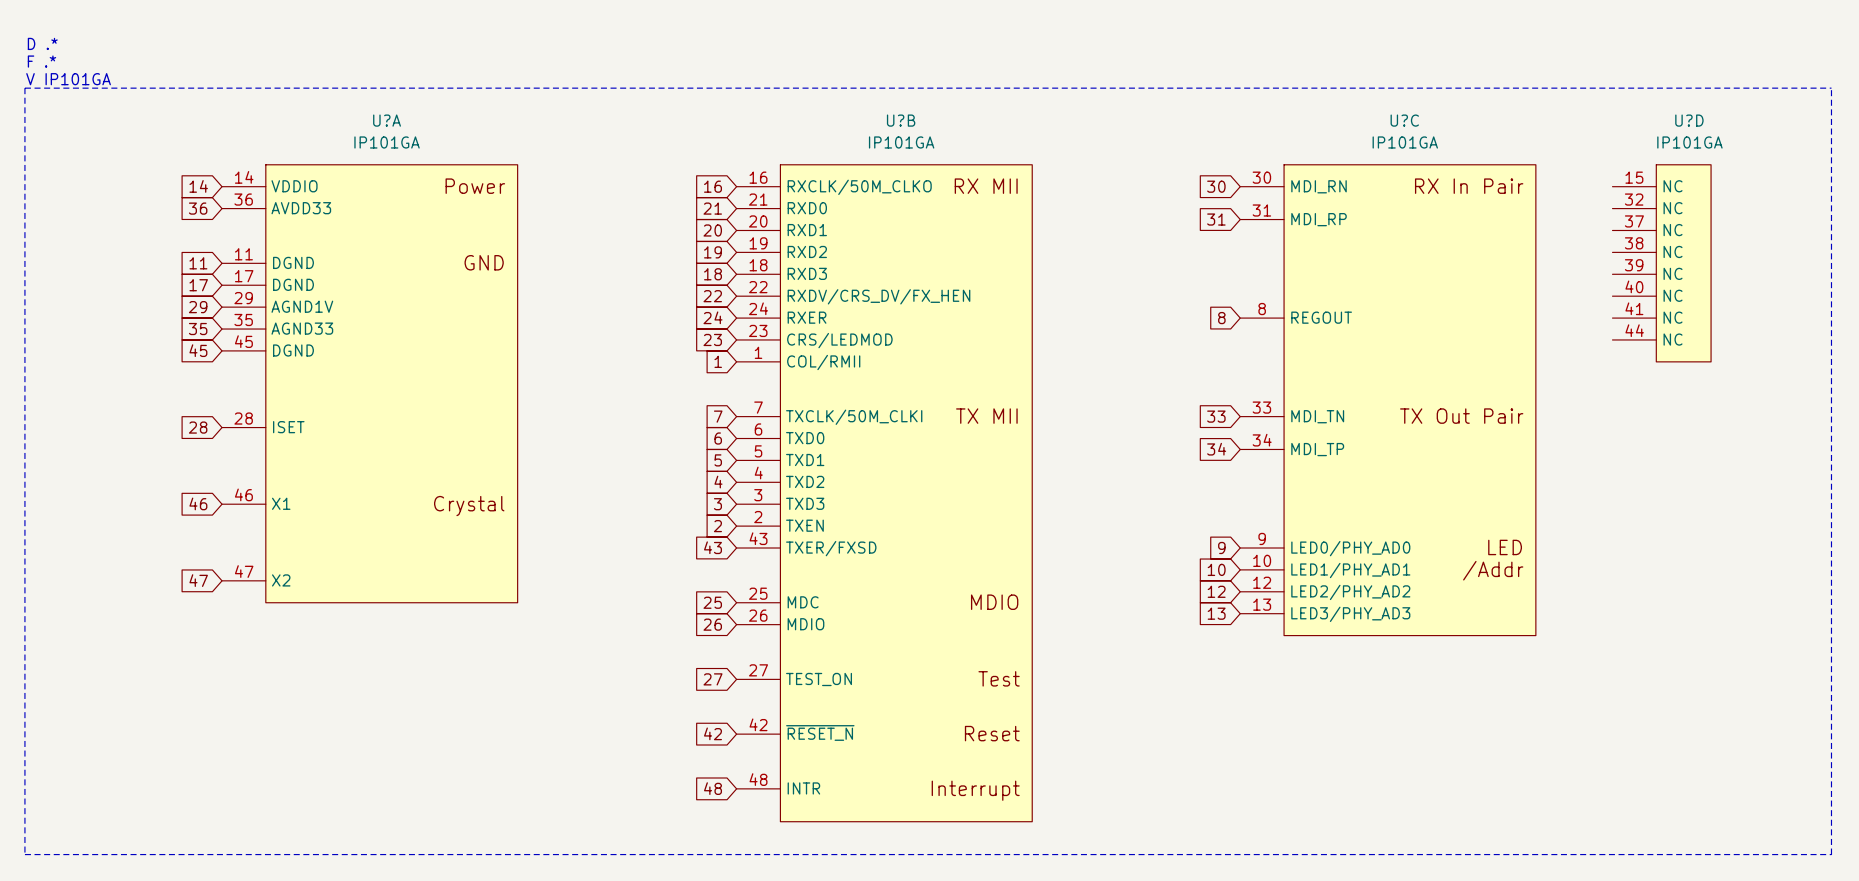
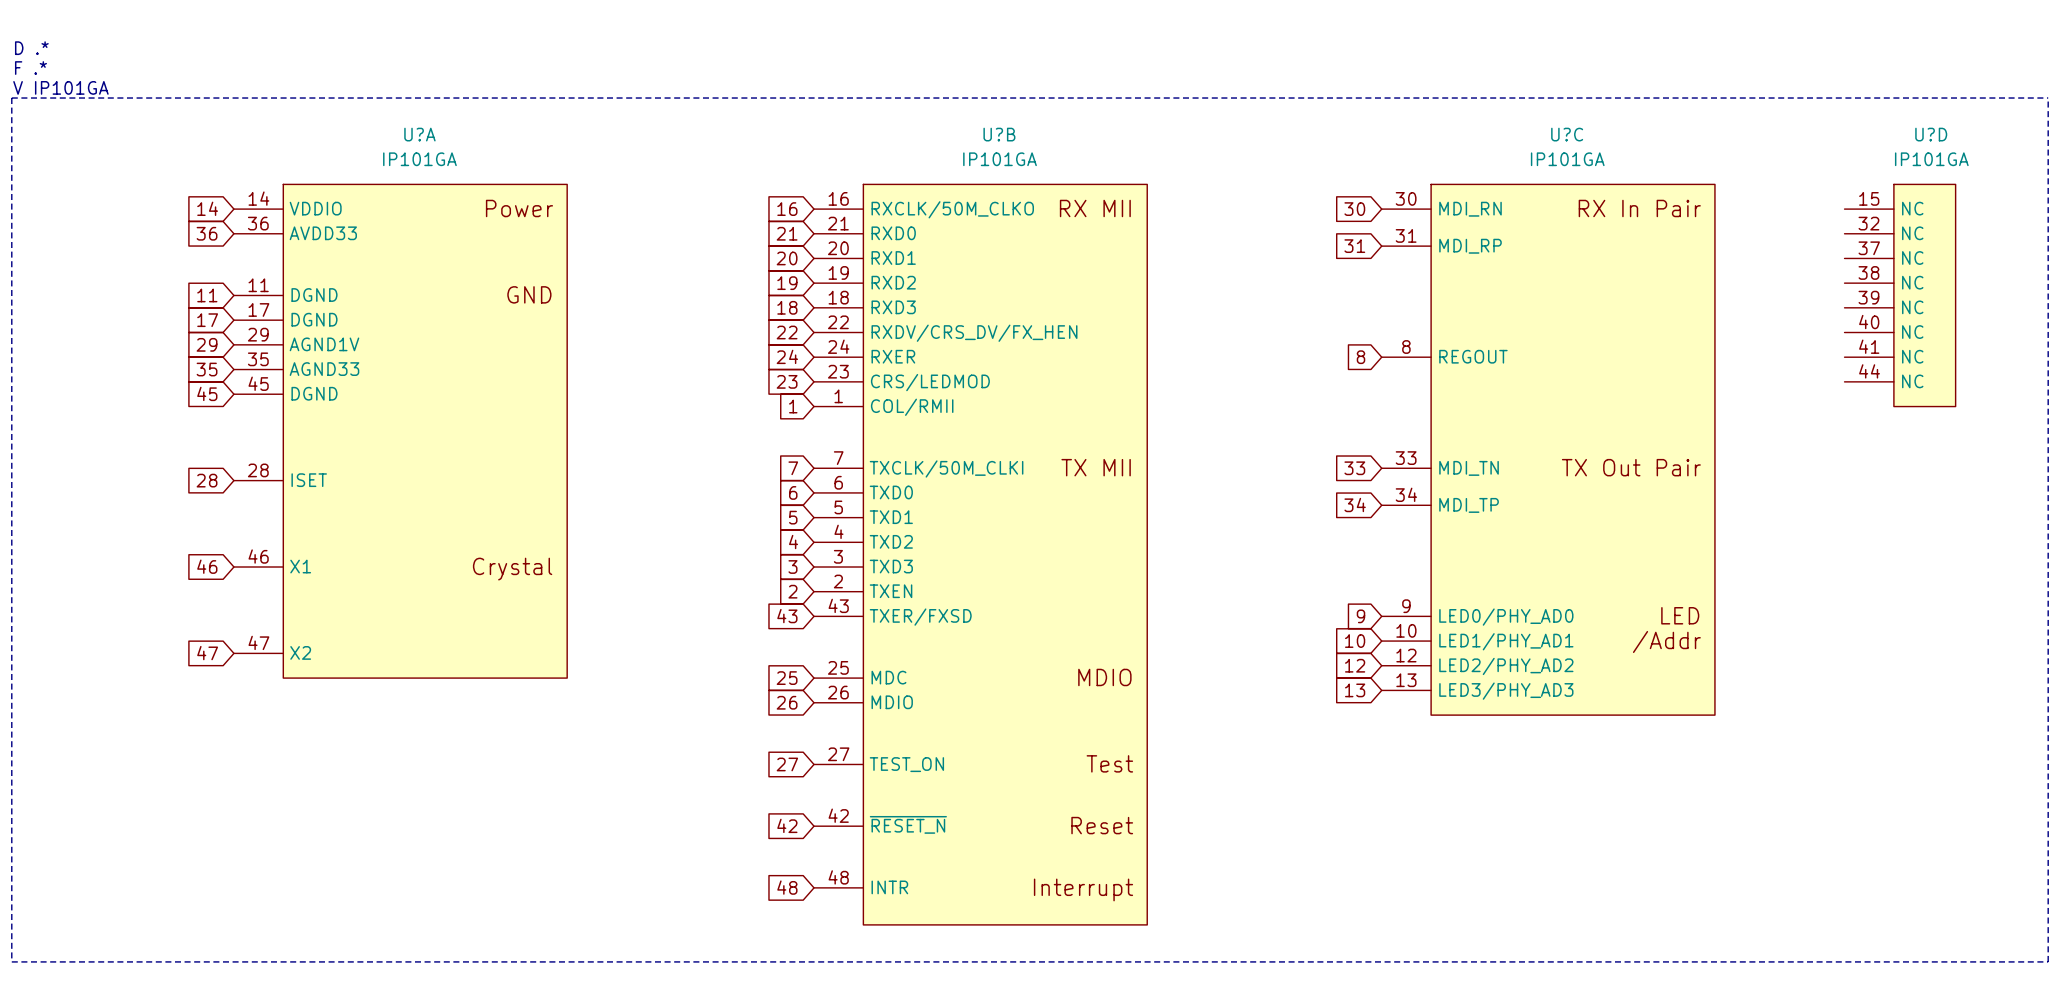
U?D position: (1661, 263) -> (1900, 295)

